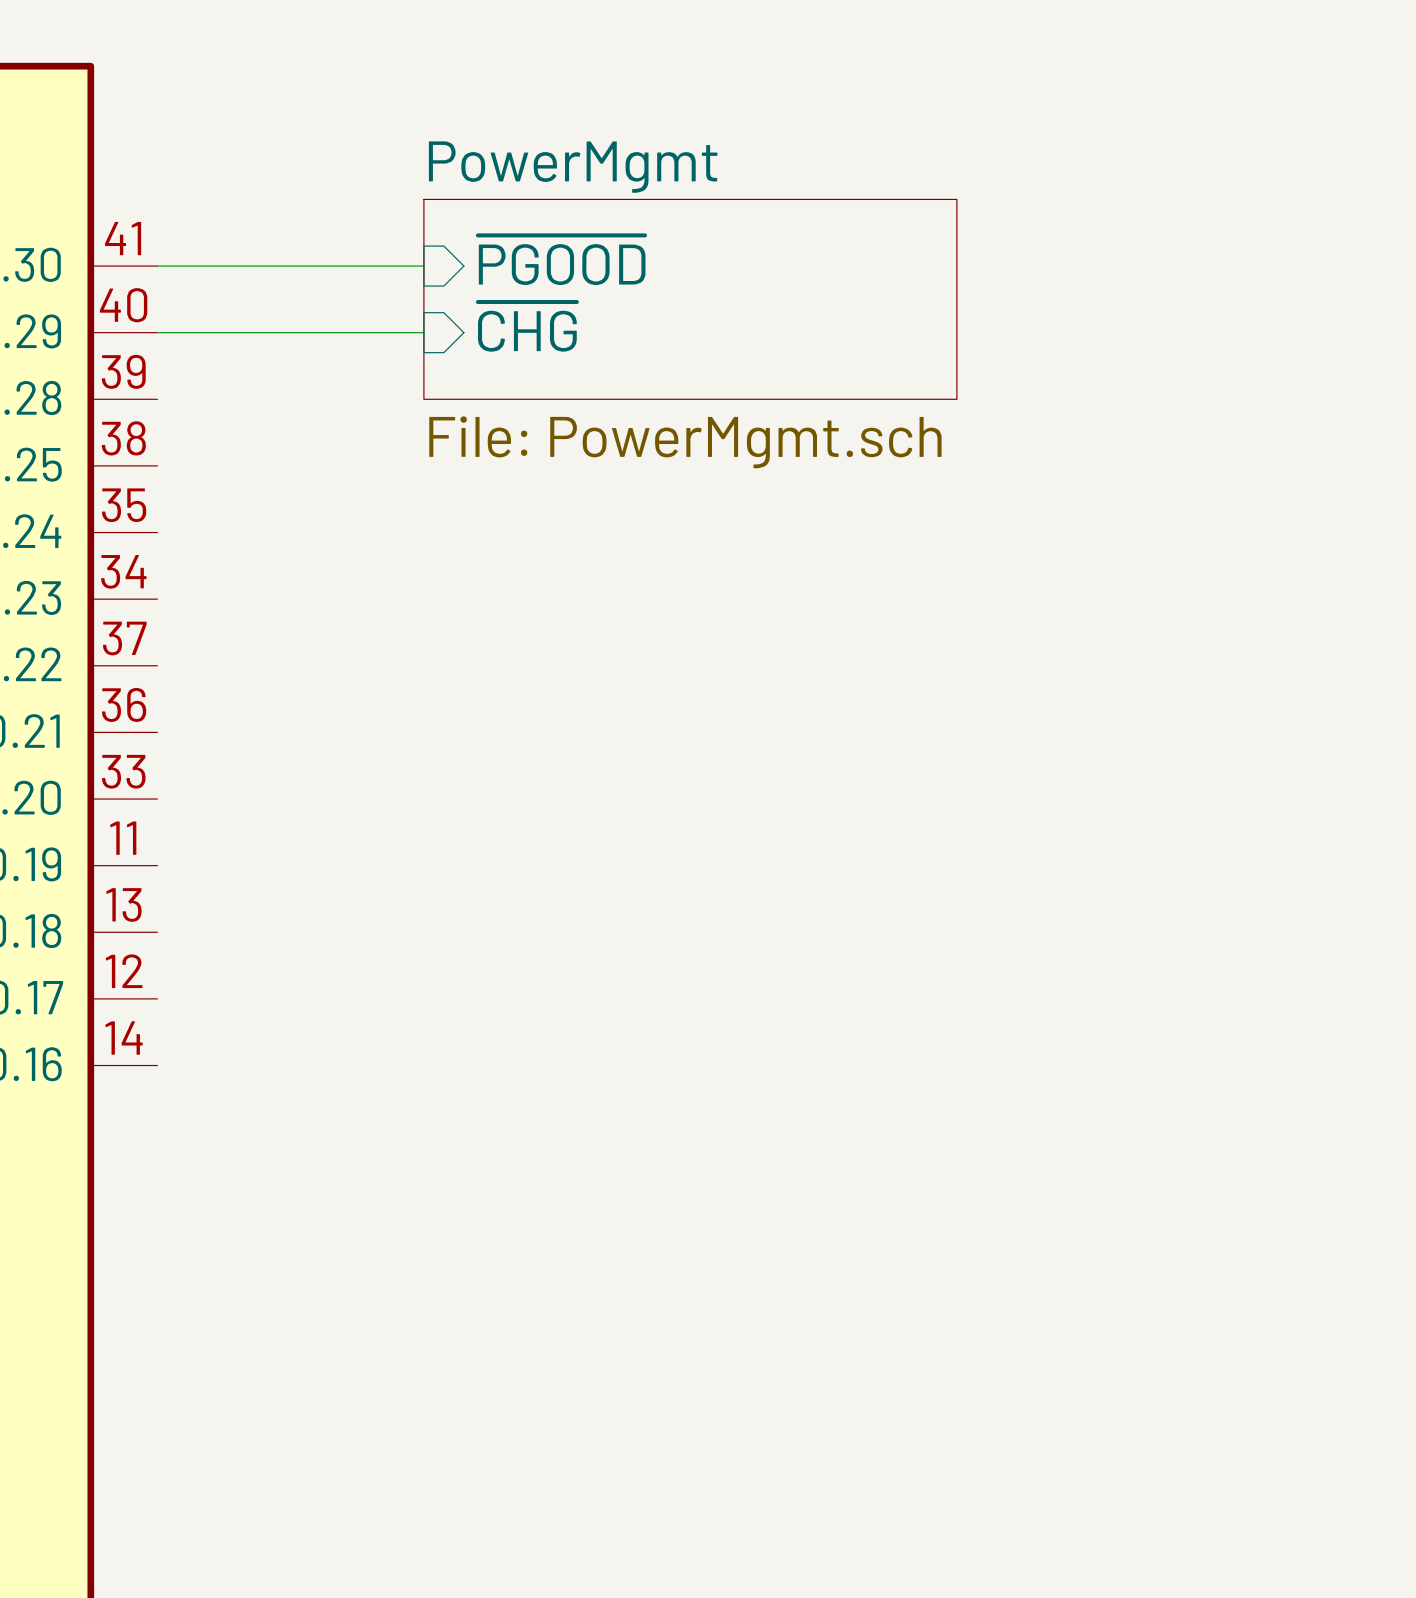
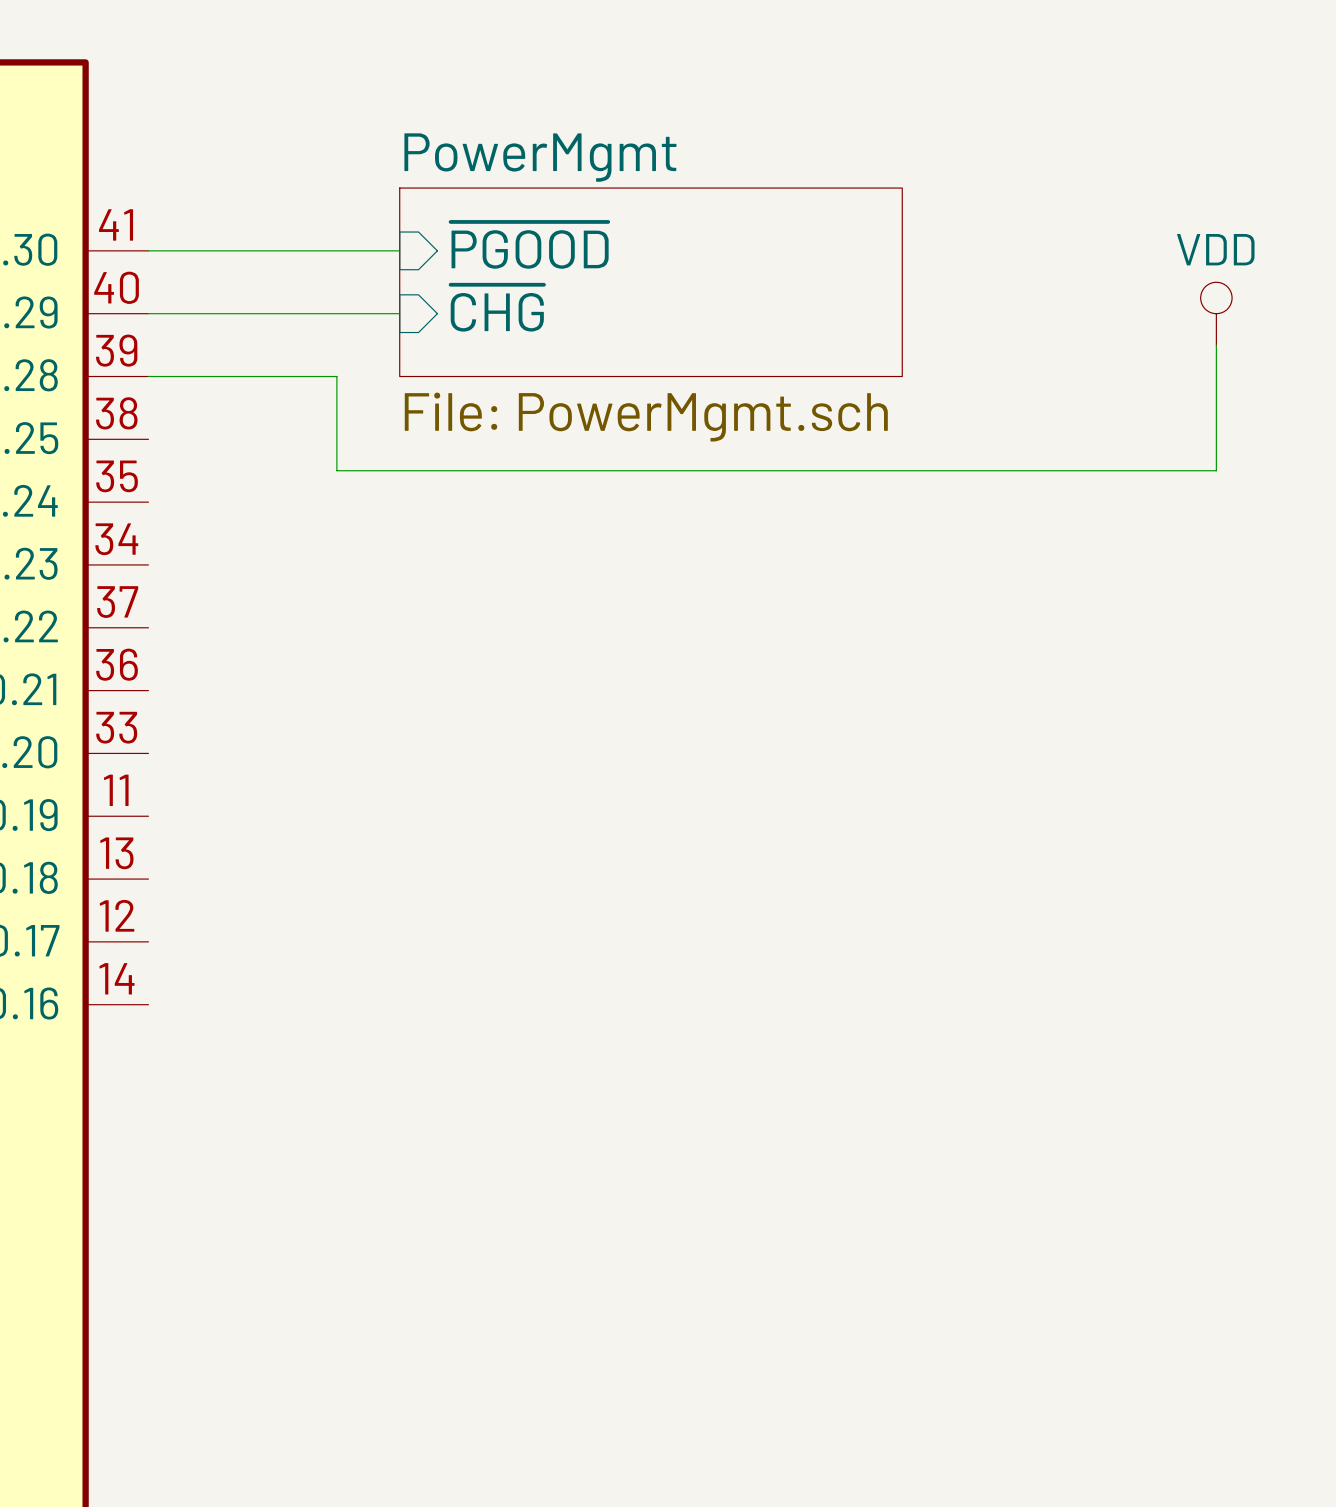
power symbol: none -> VDD (1216, 313)
wire: none -> (1216, 345) (1216, 470) (336, 470) (336, 376) (148, 376)

